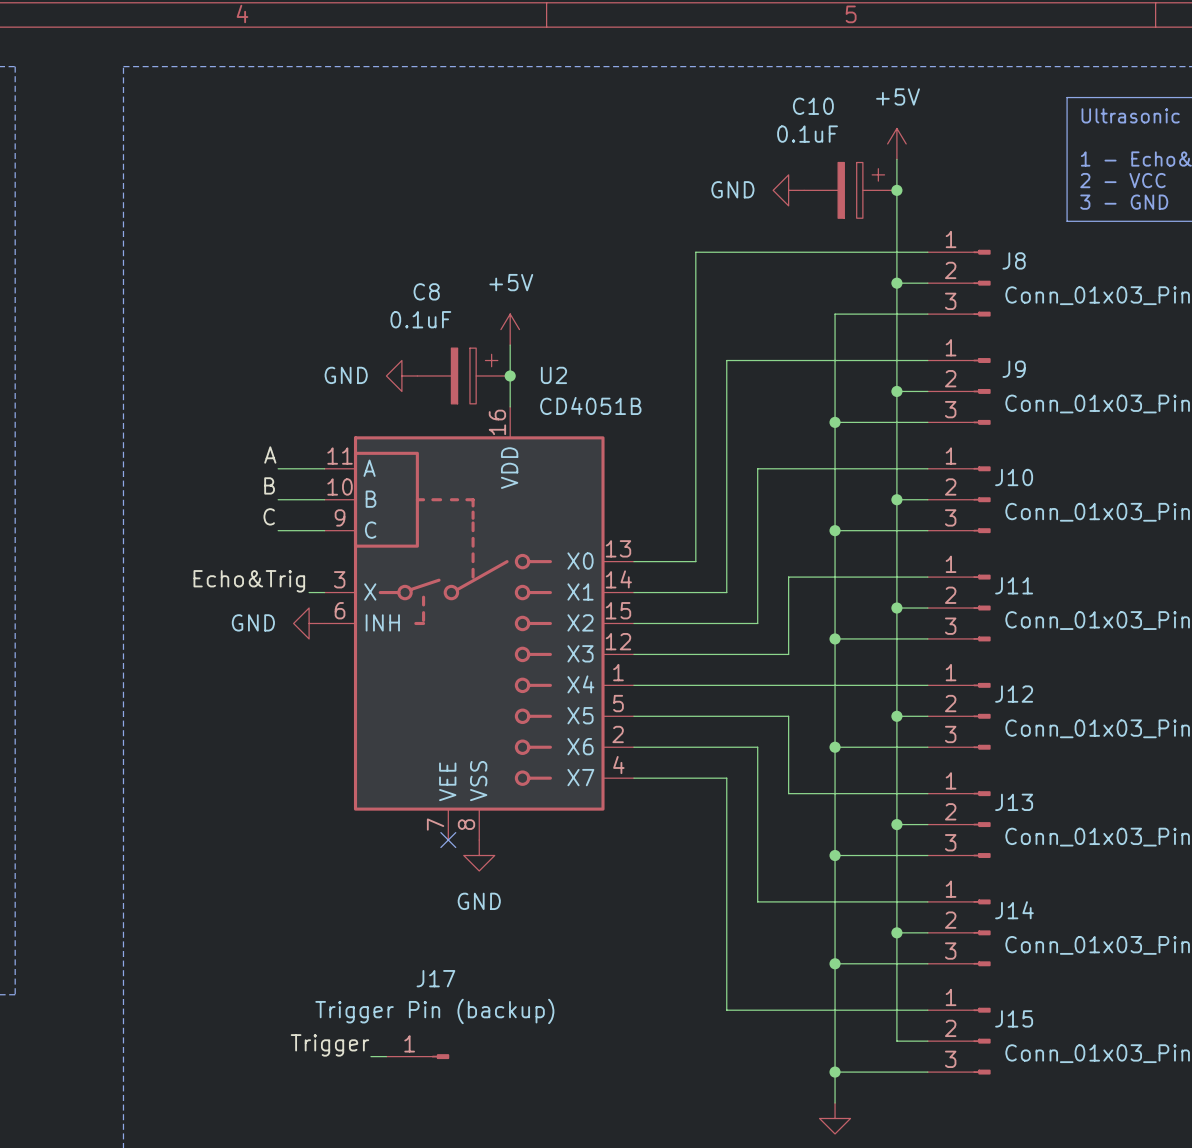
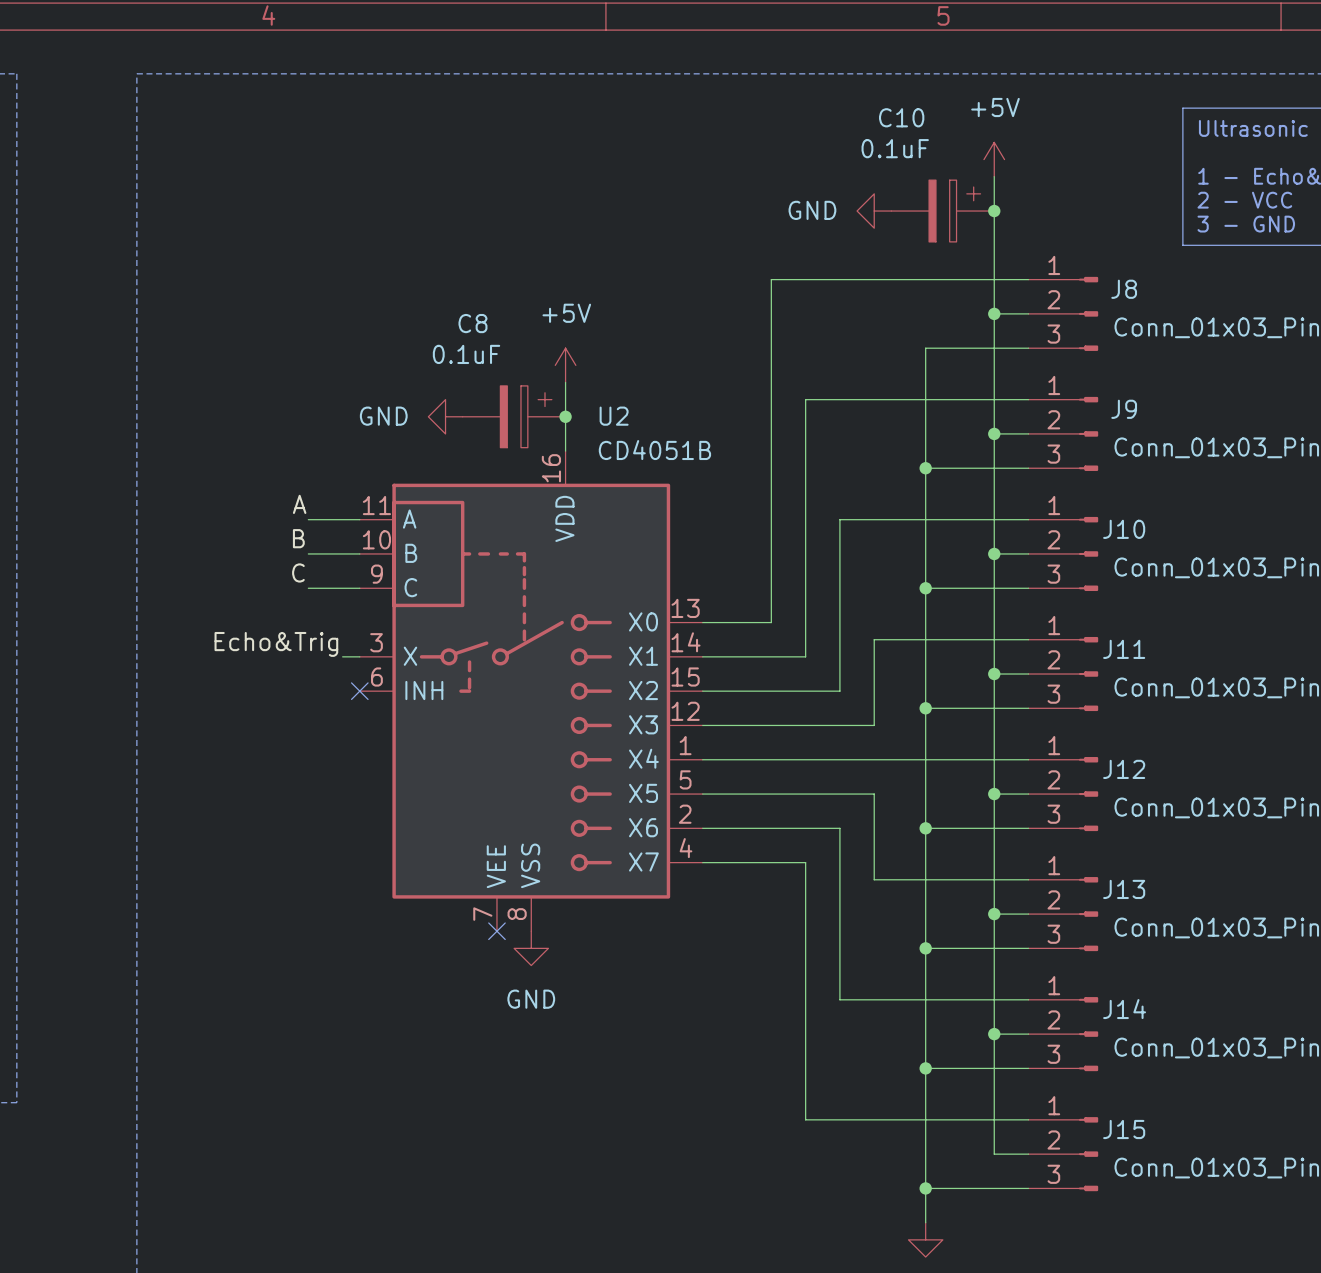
power symbol: GND (309, 623) -> none
no-connect mark: none -> (359, 691)
label: Trigger (329, 1045) -> none
wire: (370, 1056) (386, 1056) -> none
J17: Trigger Pin (backup) (417, 1056) -> none

